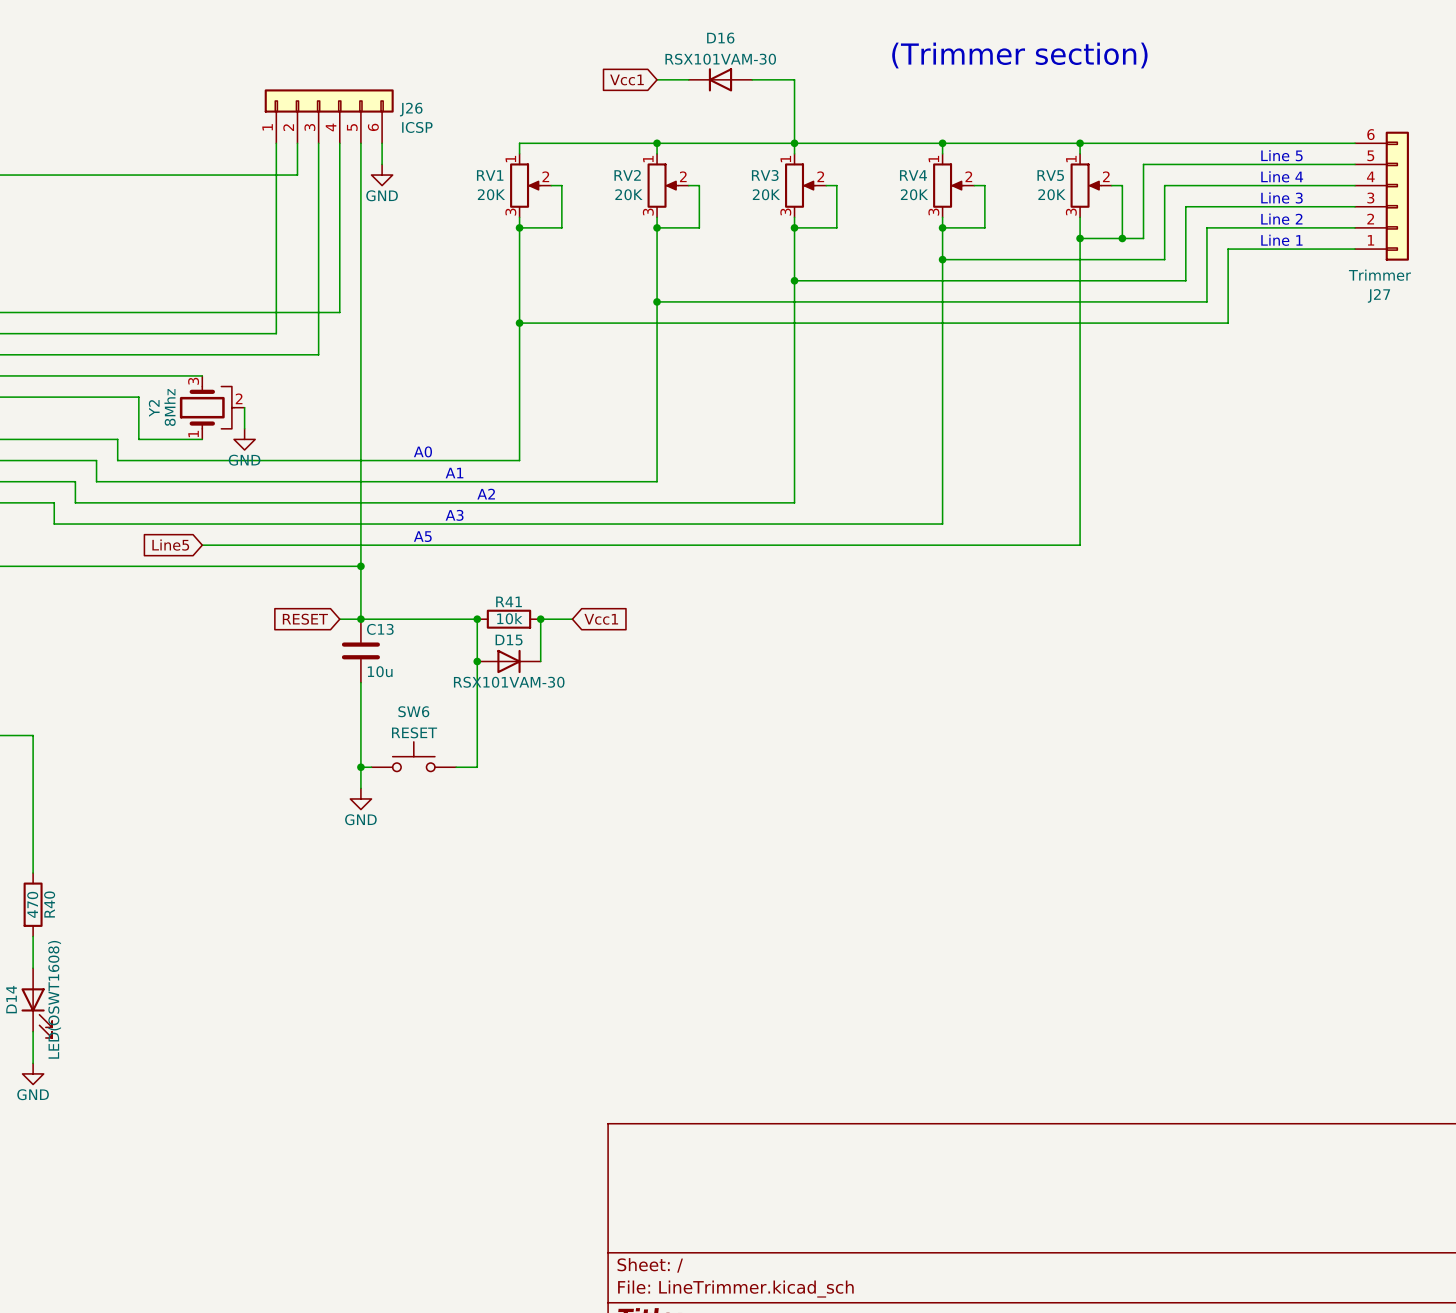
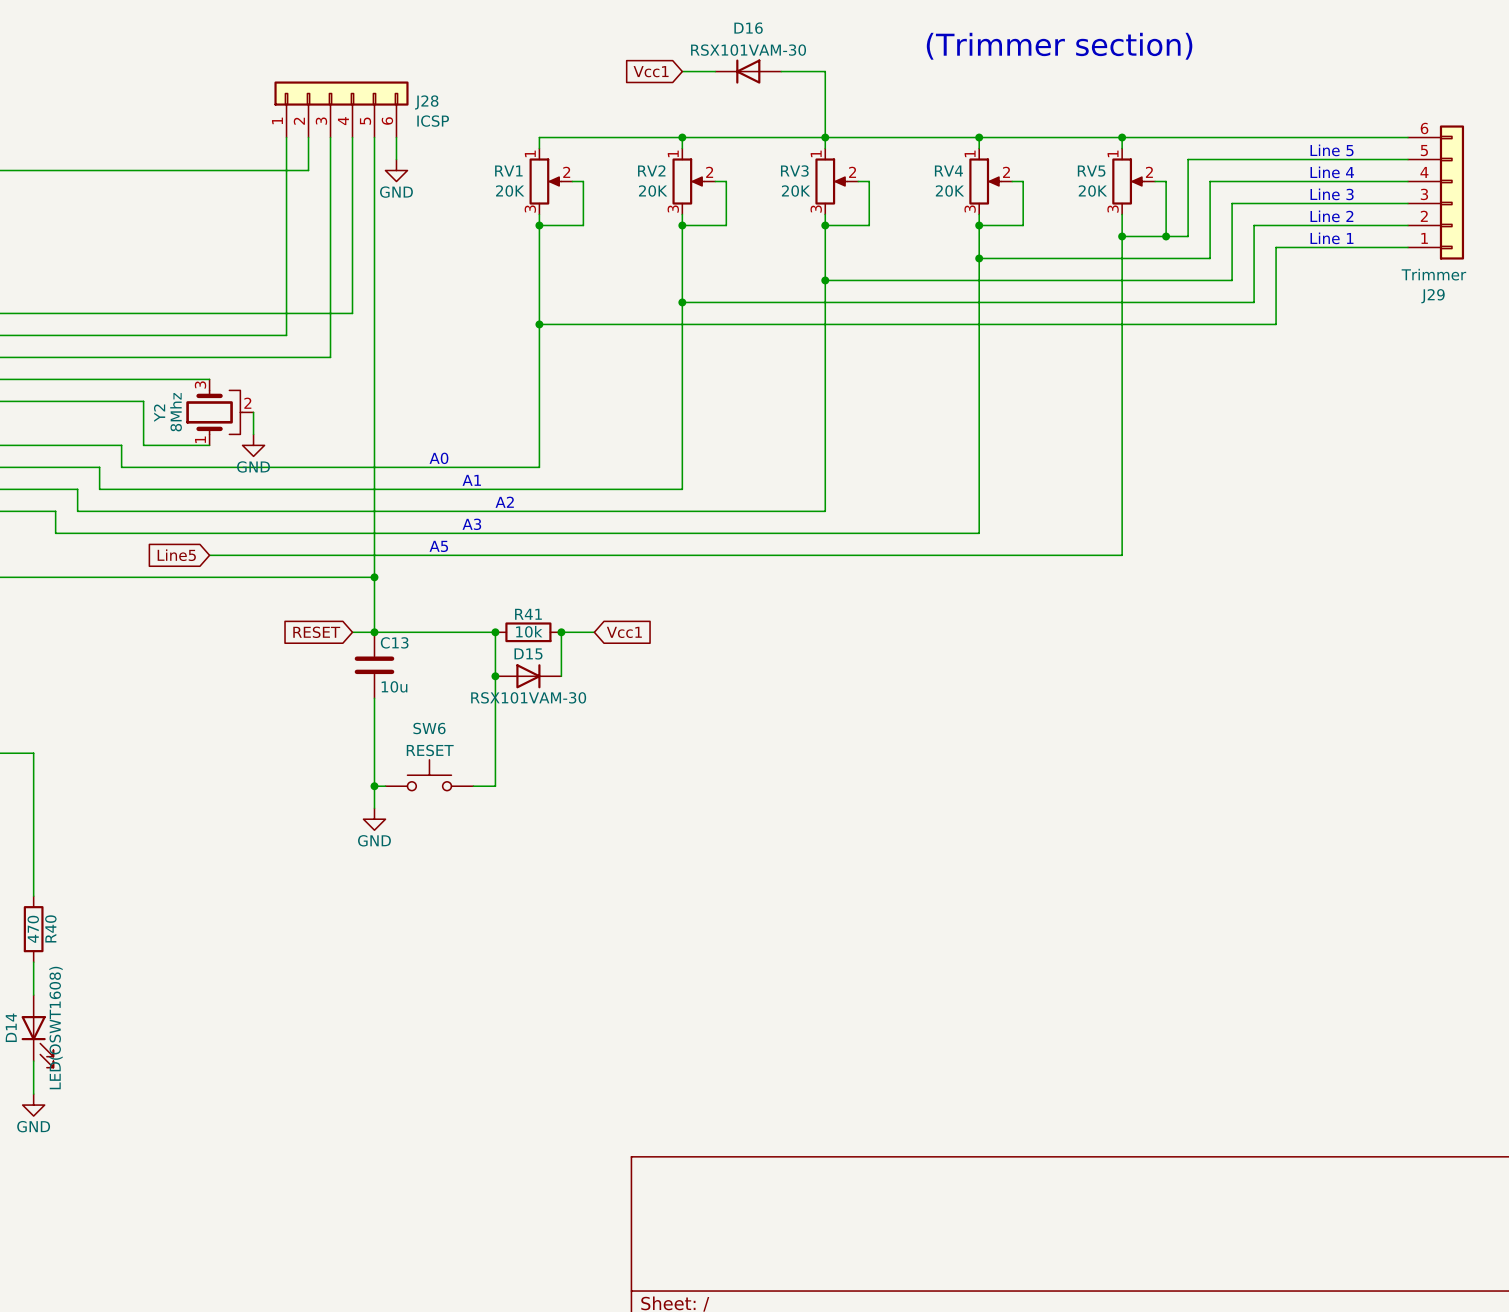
J26 name: J26 (411, 109) -> J28 (426, 102)
J27 name: J27 (1378, 295) -> J29 (1433, 296)

